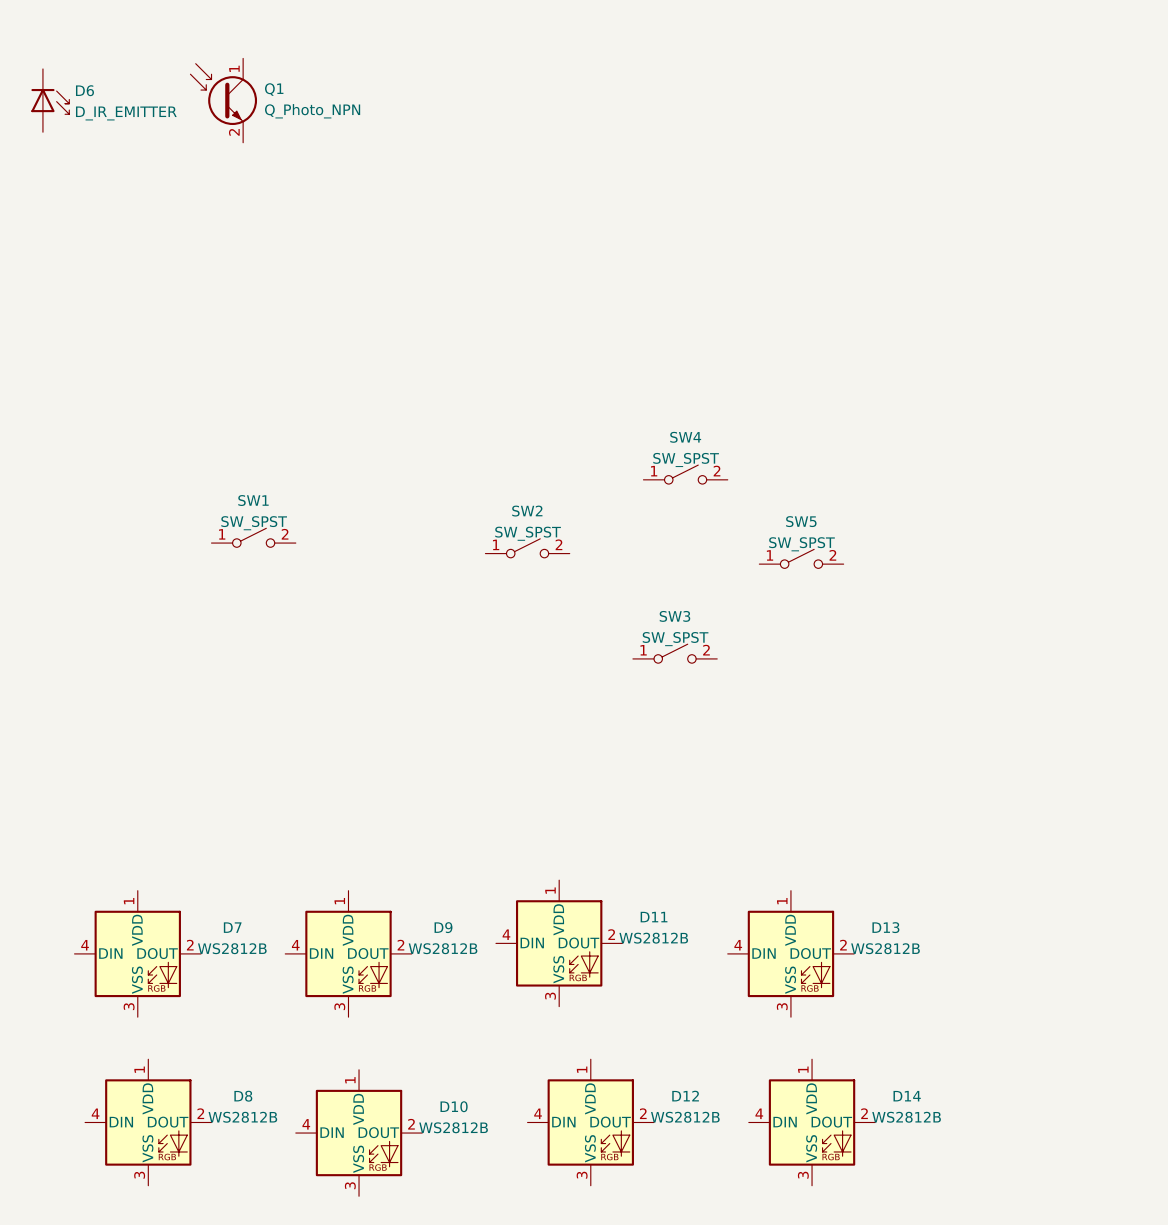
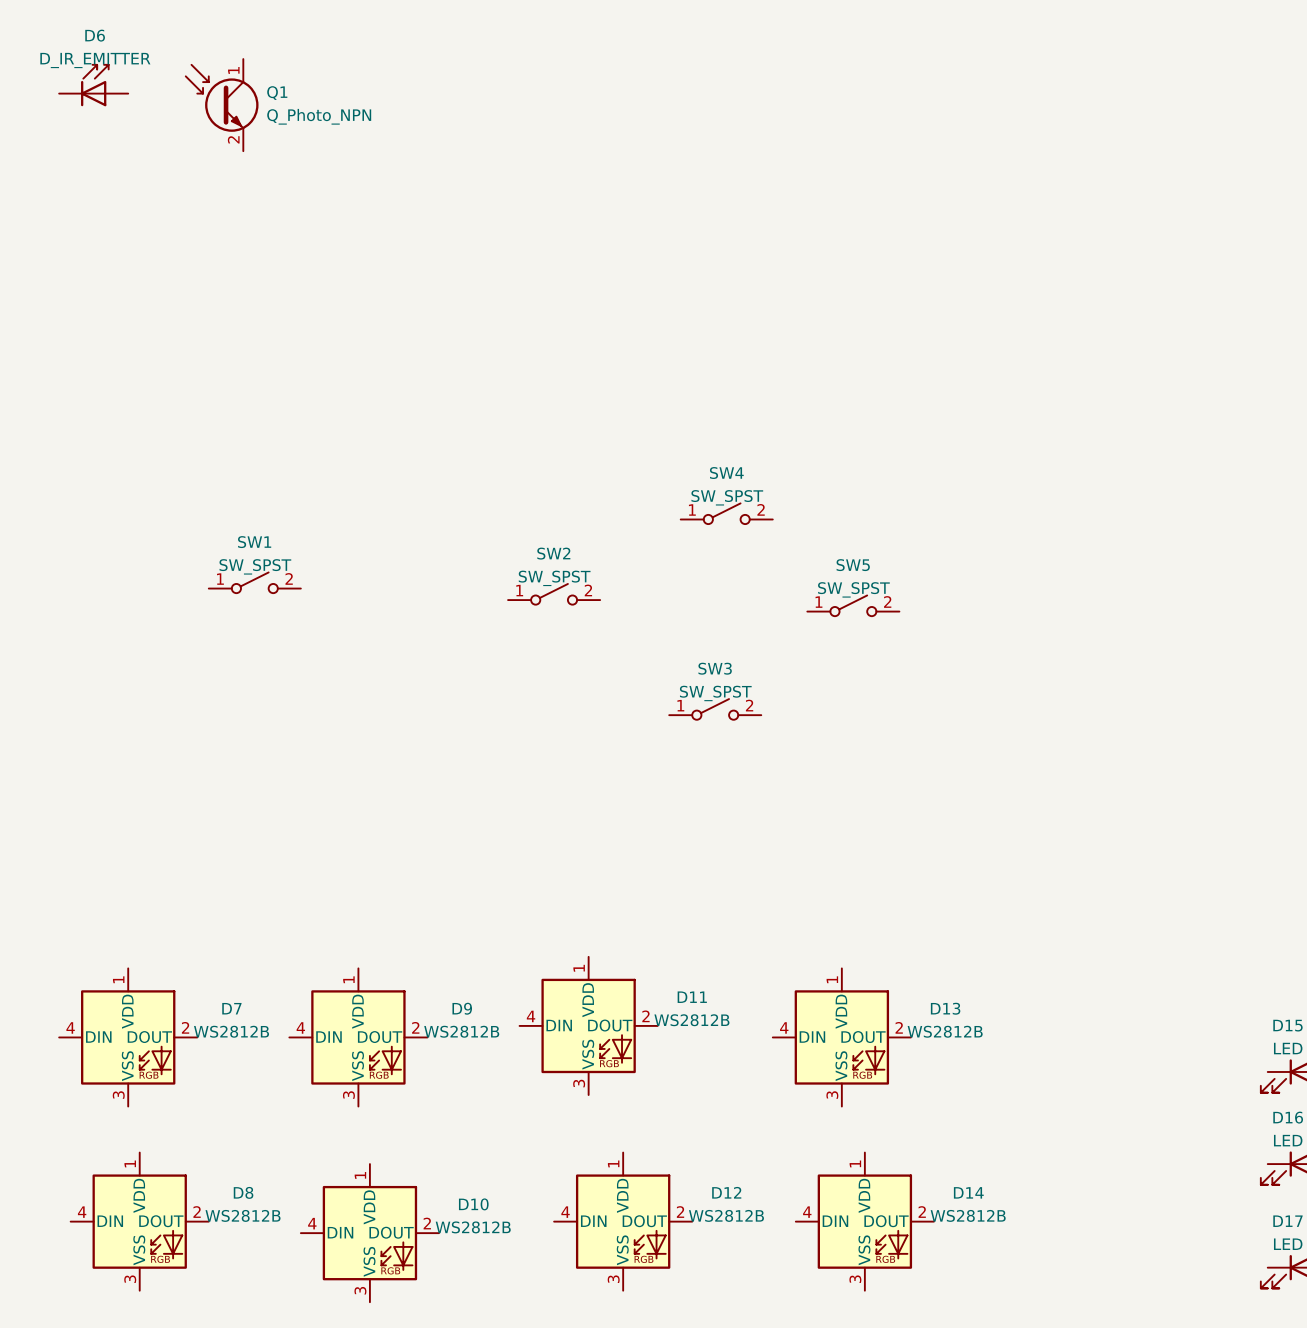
D6 position: (50, 100) -> (93, 85)
D6 rotation: 0° (50, 101) -> 90° counterclockwise (94, 85)
D6 value position: D_IR_EMITTER (126, 113) -> D_IR_EMITTER (95, 60)

